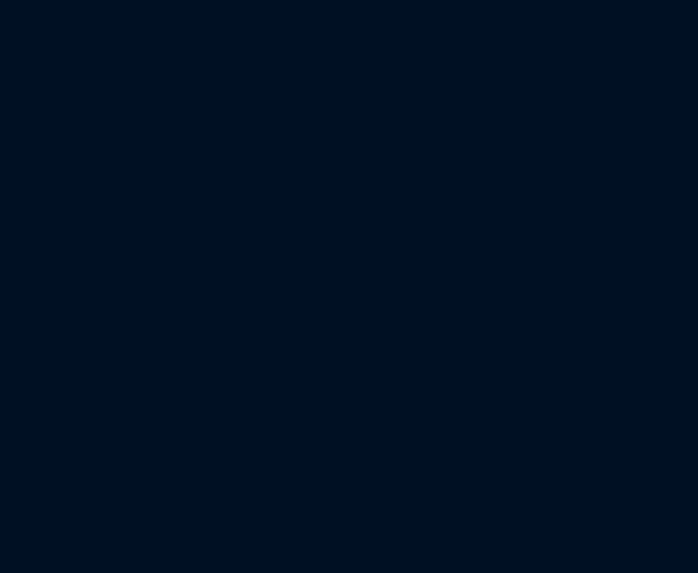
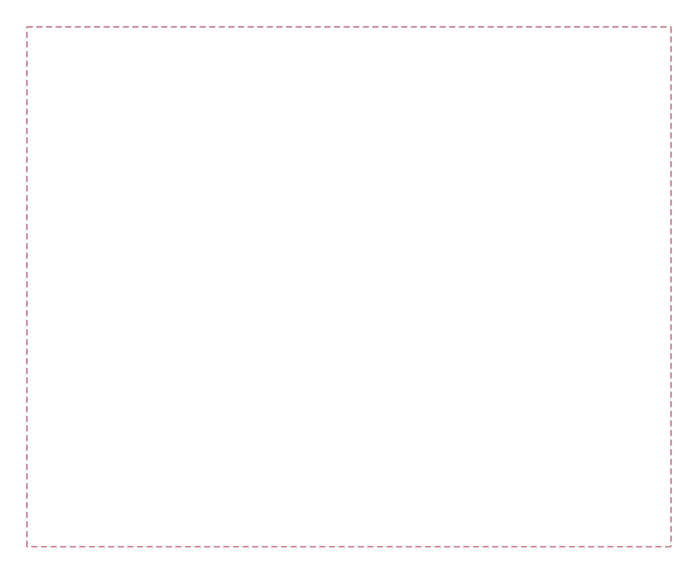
top zone outline: none -> (26, 26) (671, 26) (671, 546) (26, 546) (26, 26)

